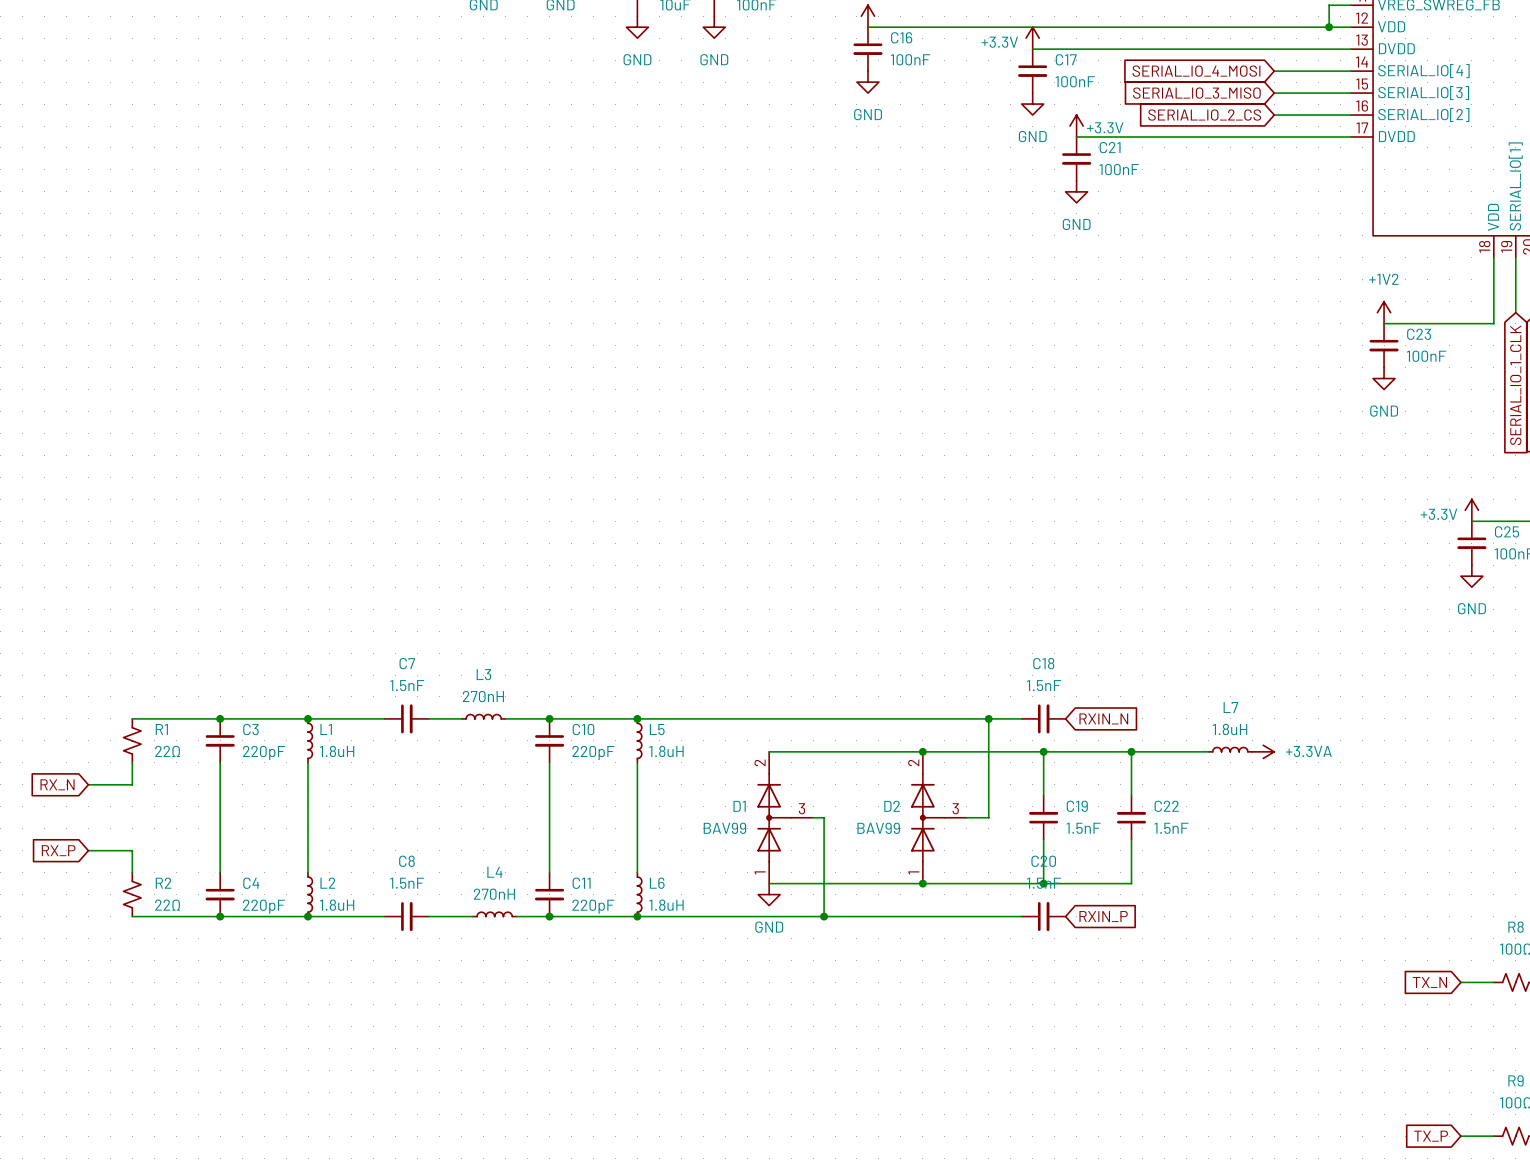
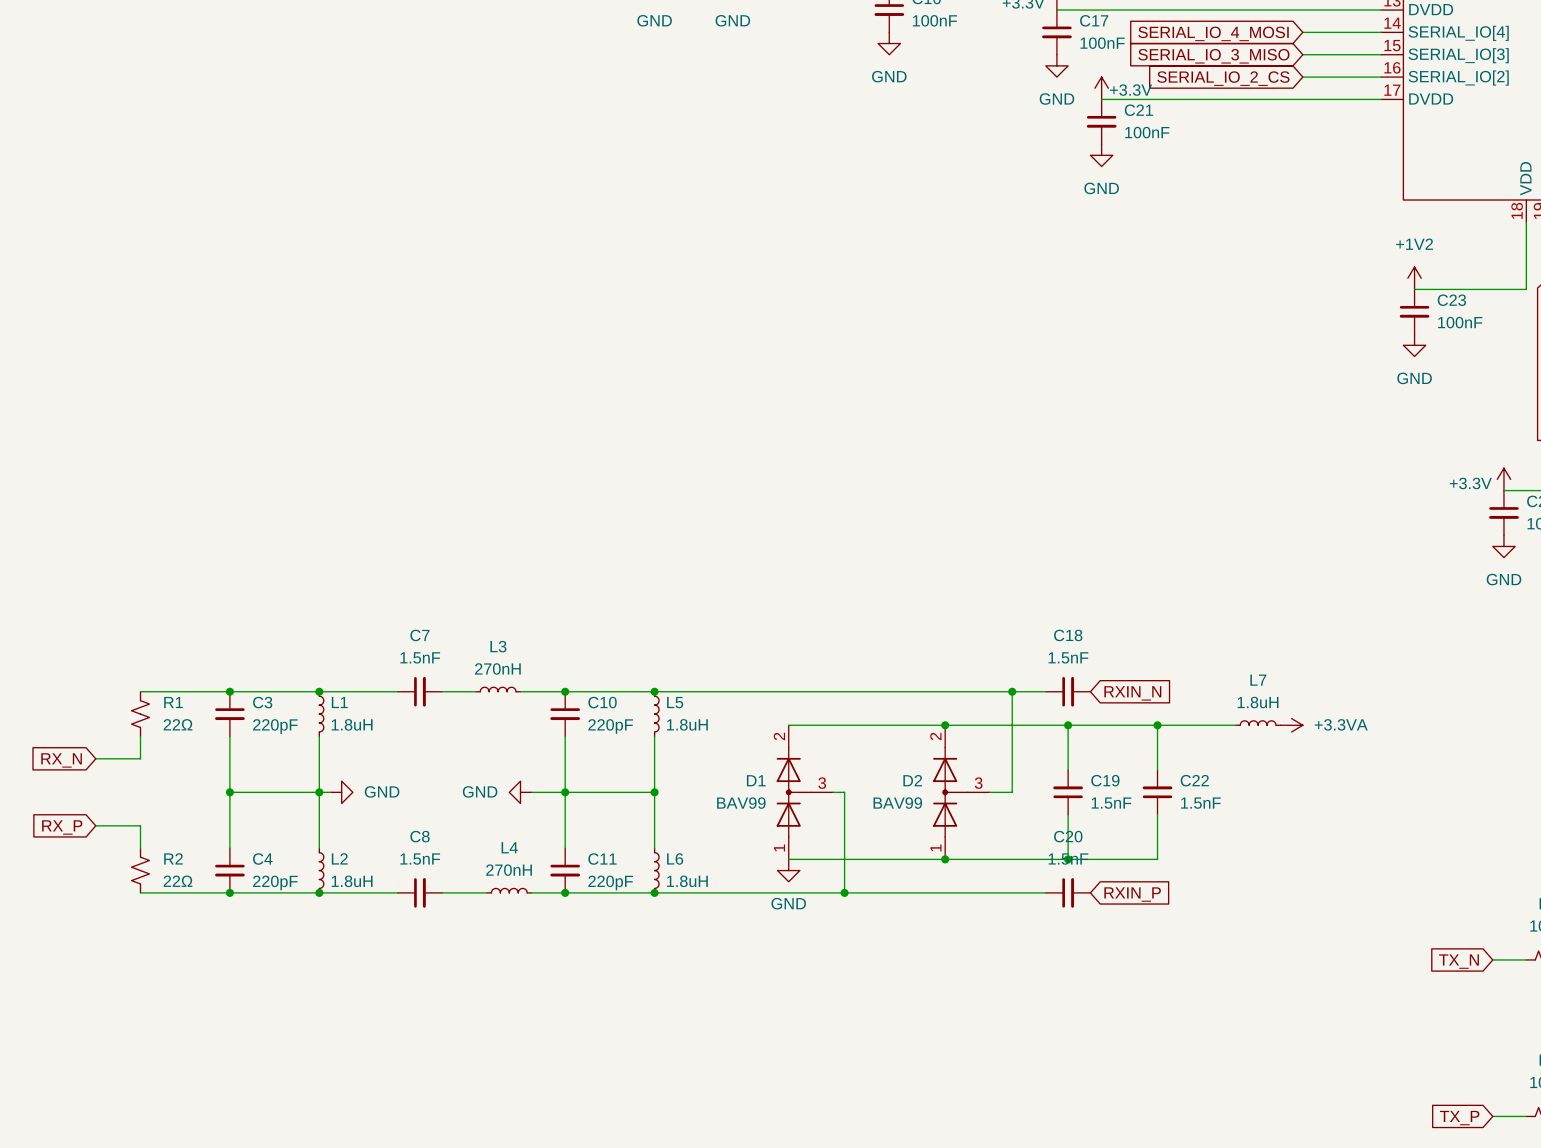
wire: none -> (229, 792) (330, 792)
junction: none -> (229, 792)
junction: none -> (319, 792)
power symbol: none -> GND (341, 792)
power symbol: none -> GND (520, 792)
wire: none -> (531, 792) (654, 792)
junction: none -> (565, 792)
junction: none -> (654, 792)

